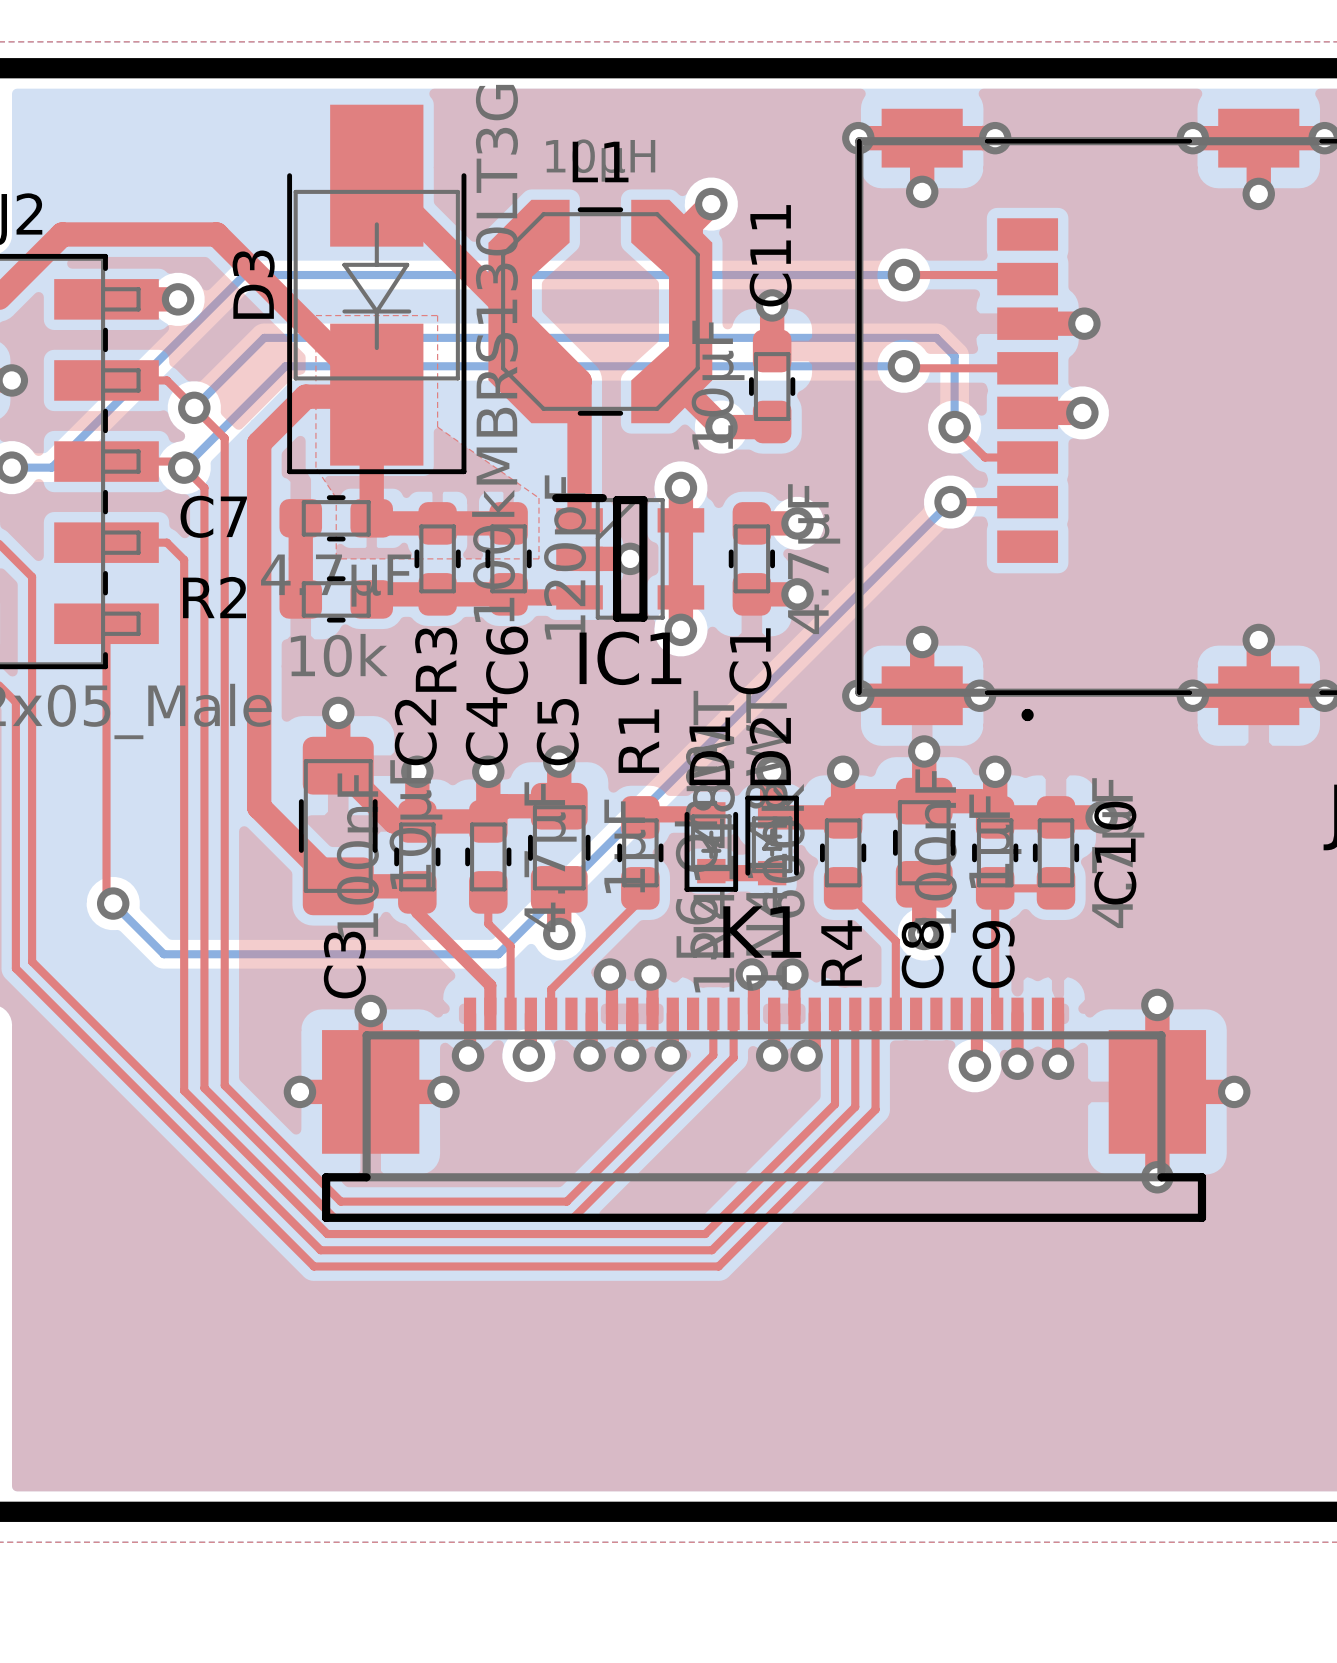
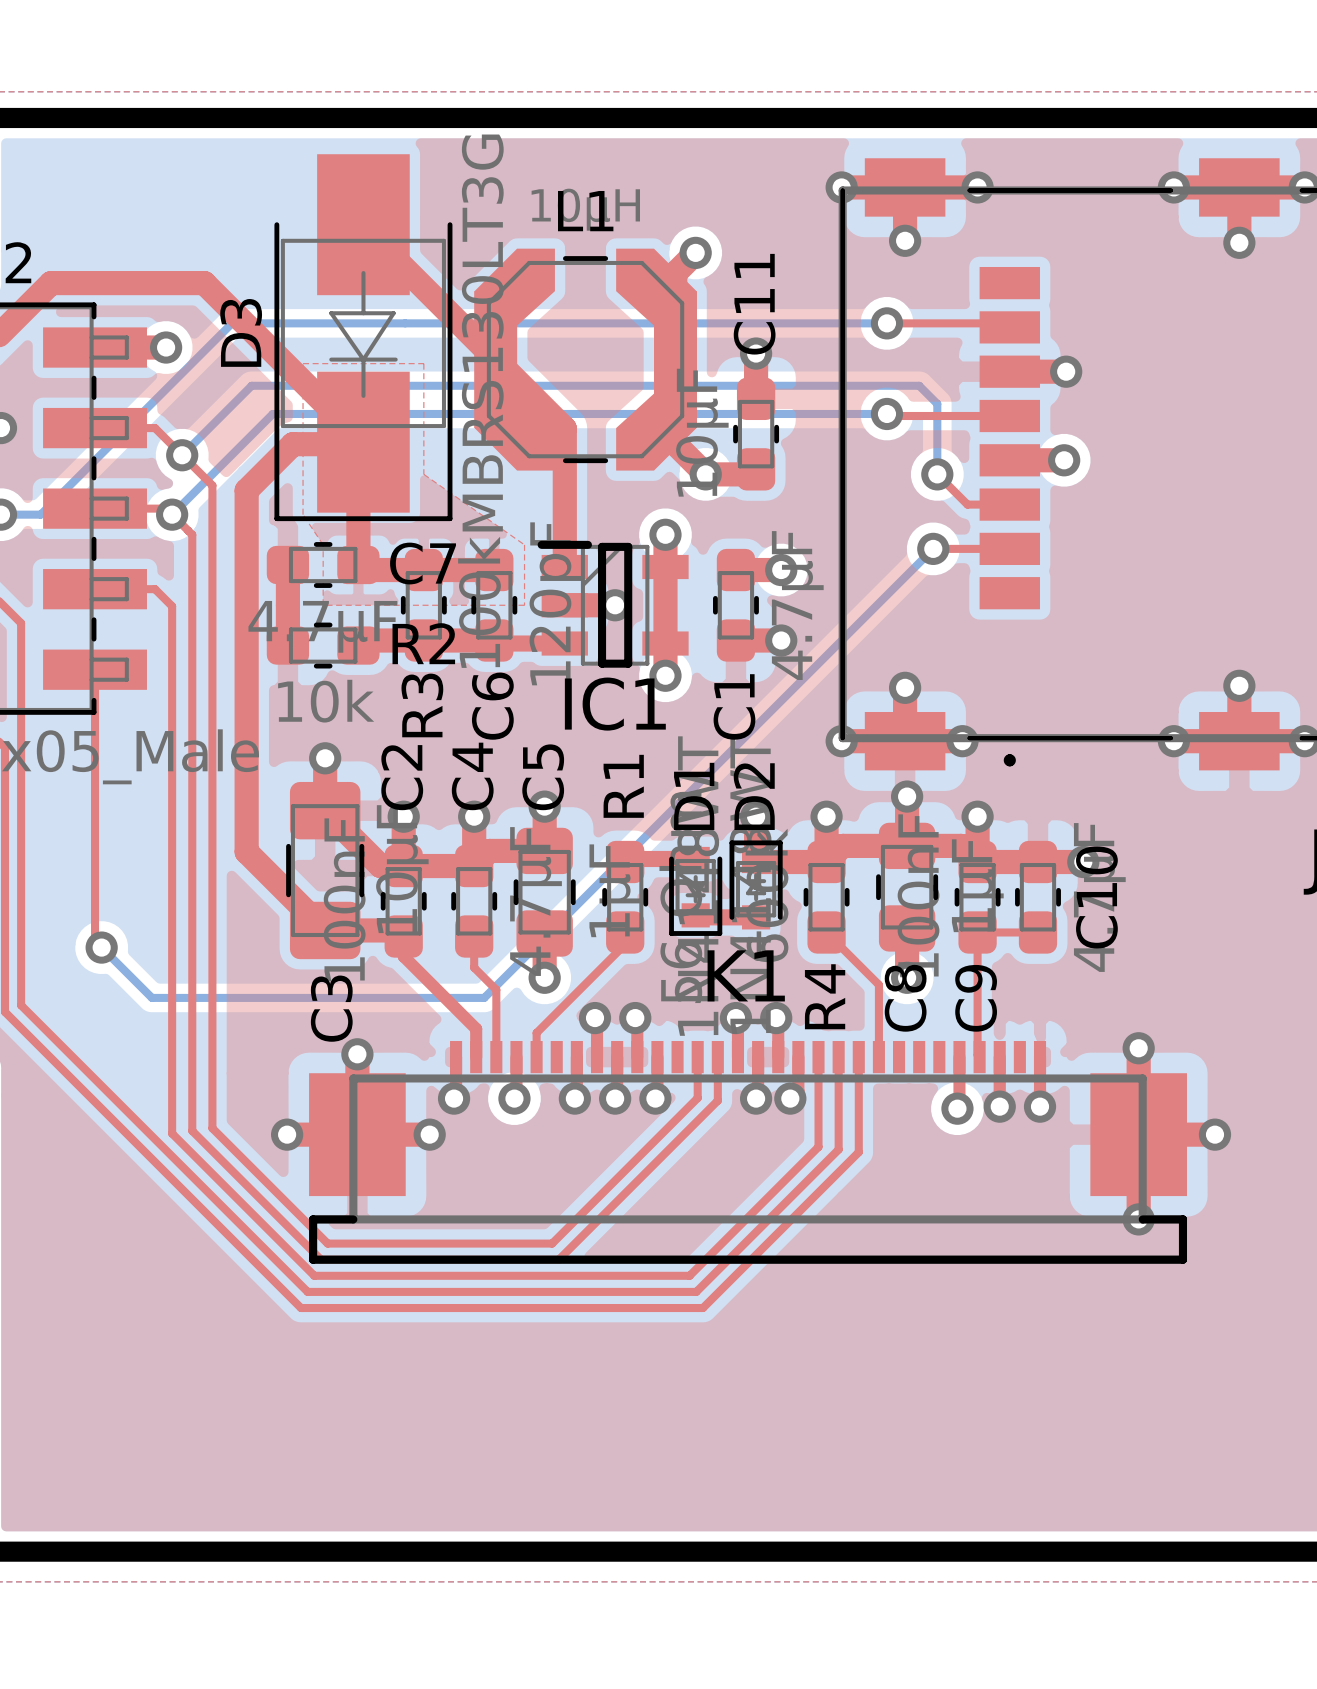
C7 name position: C7 (213, 516) -> C7 (423, 563)
R2 name position: R2 (214, 597) -> R2 (423, 643)

